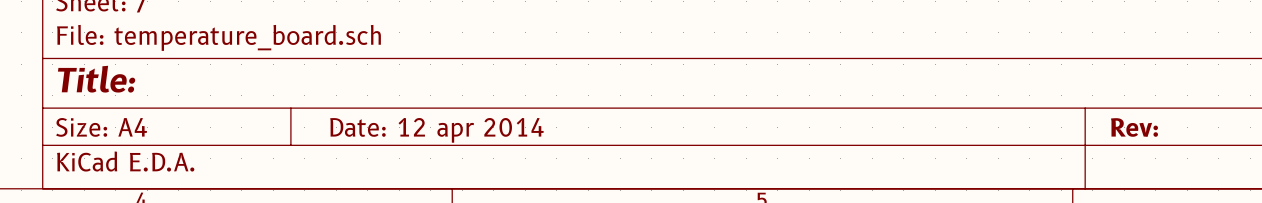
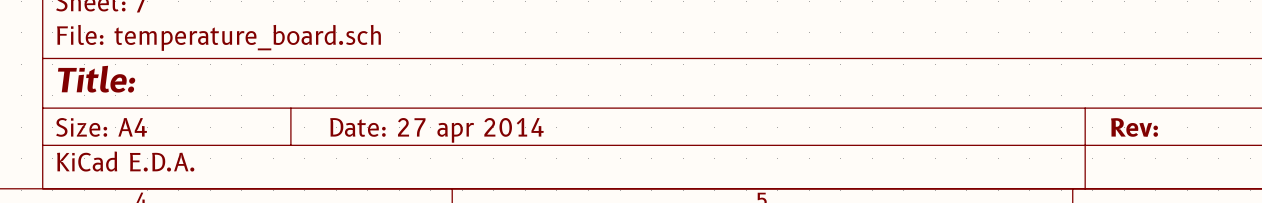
title block: Date: 12 apr 2014 (436, 130) -> Date: 27 apr 2014 (436, 130)

